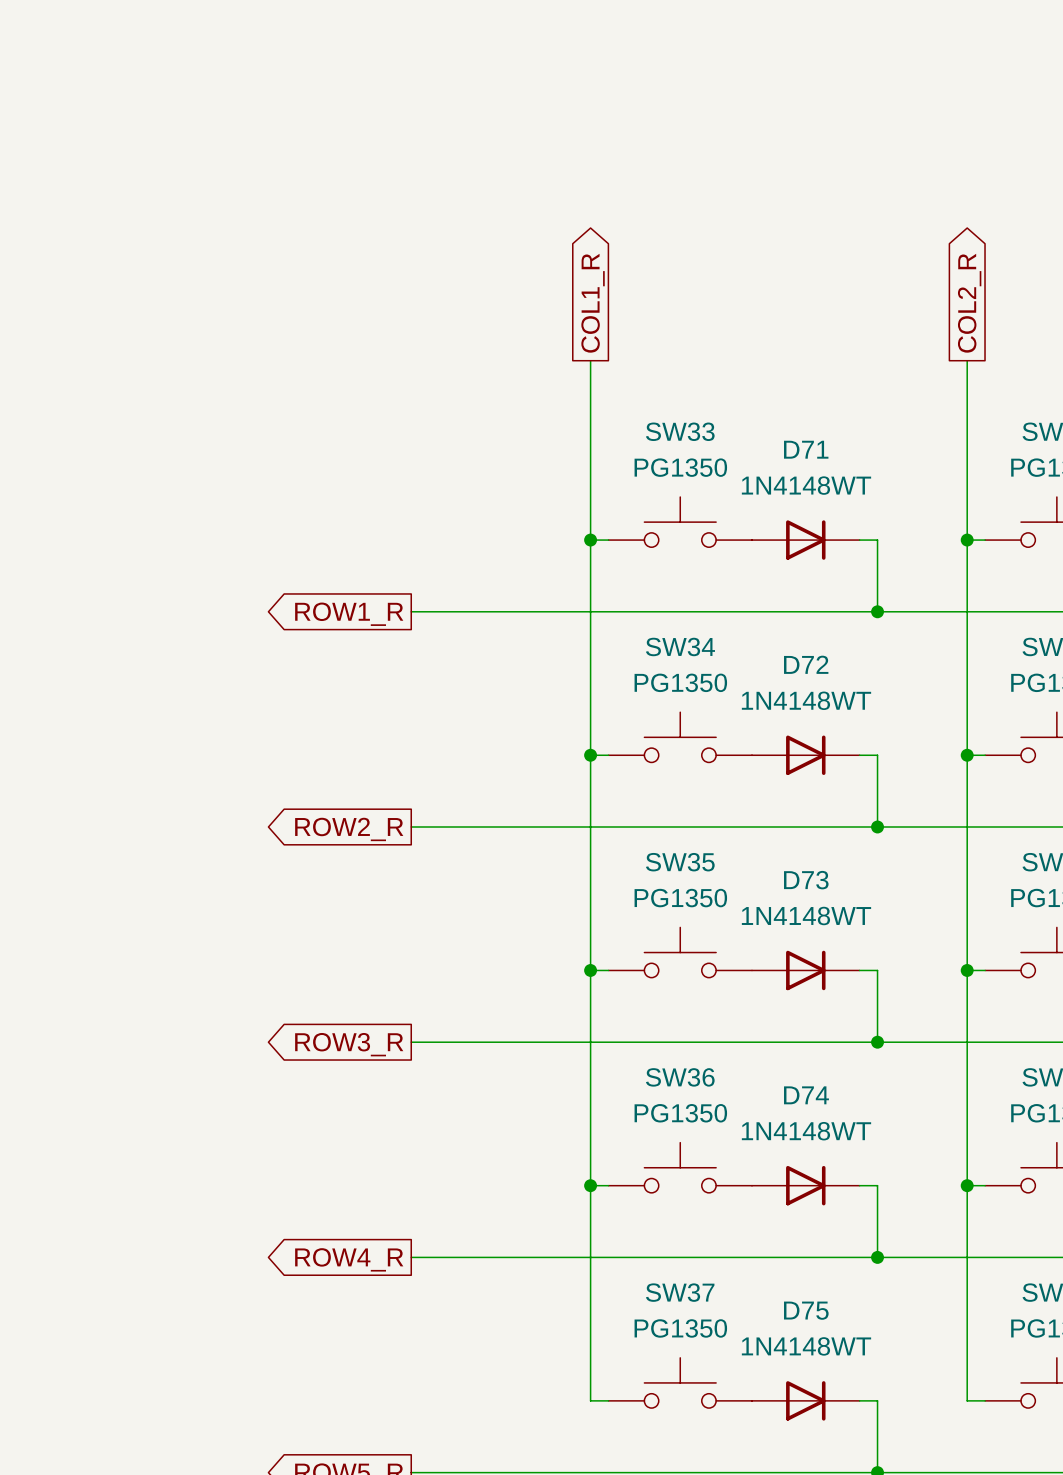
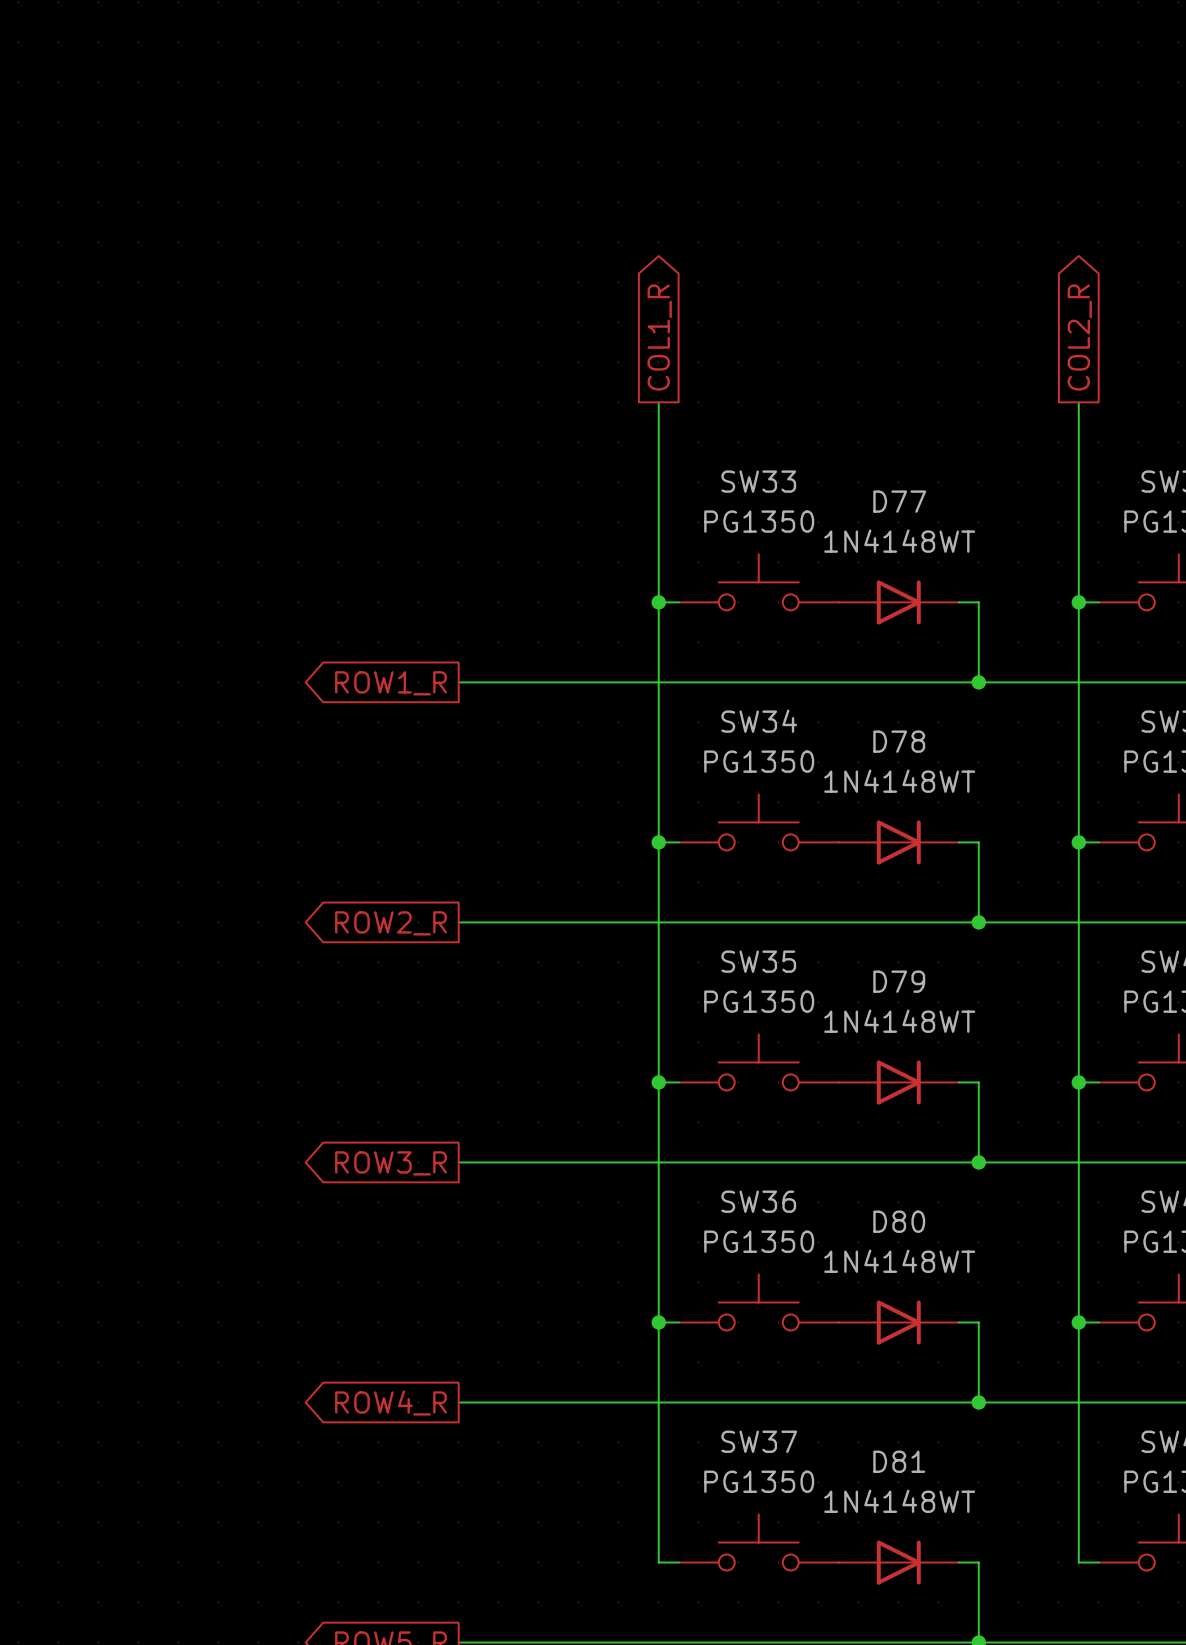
D71 name: D71 (806, 449) -> D77 (899, 501)
D72 name: D72 (806, 664) -> D78 (899, 741)
D73 name: D73 (806, 880) -> D79 (899, 981)
D74 name: D74 (806, 1095) -> D80 (899, 1221)
D75 name: D75 (806, 1310) -> D81 (899, 1461)

